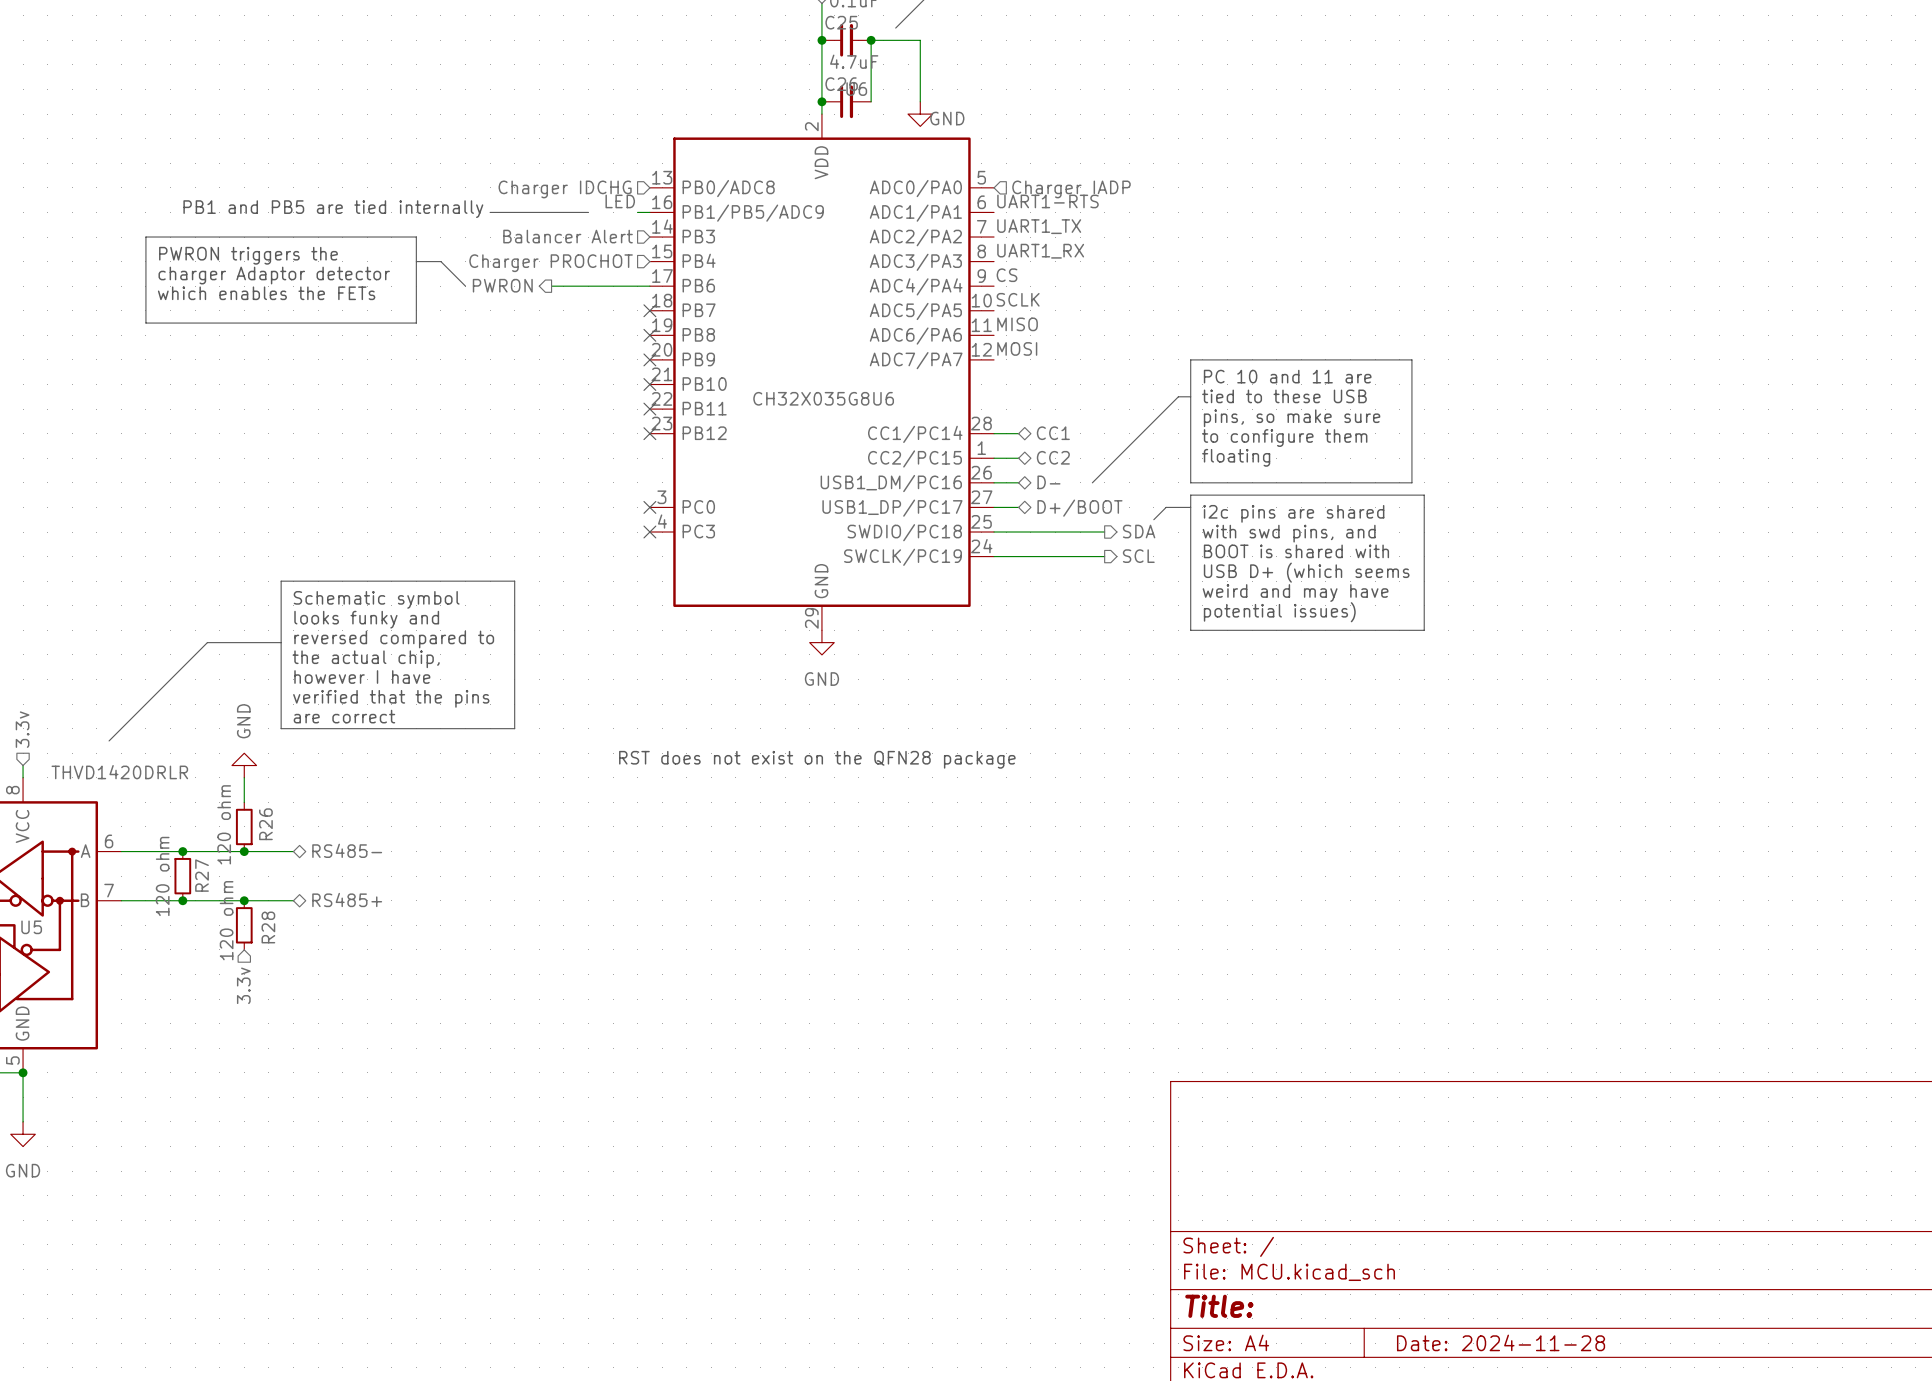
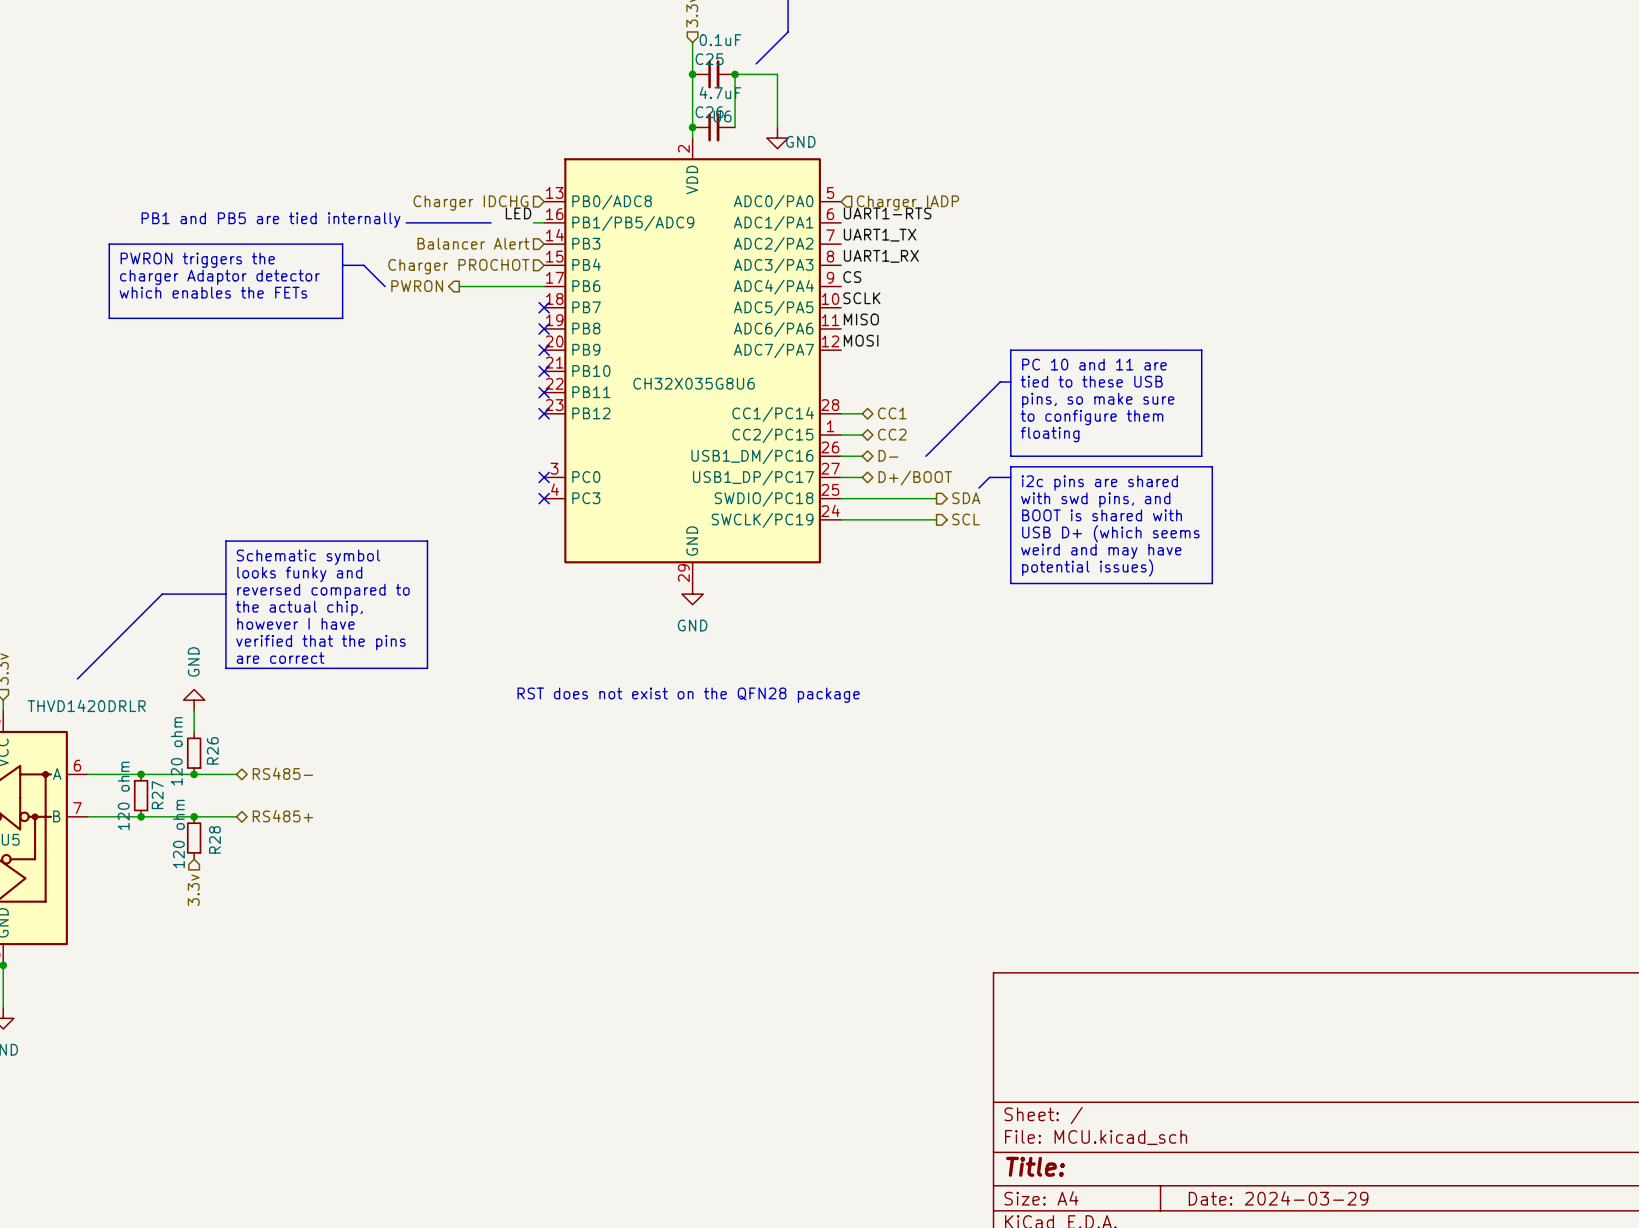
title block: Date: 2024-11-28 (1501, 1342) -> Date: 2024-03-29 (1278, 1198)

